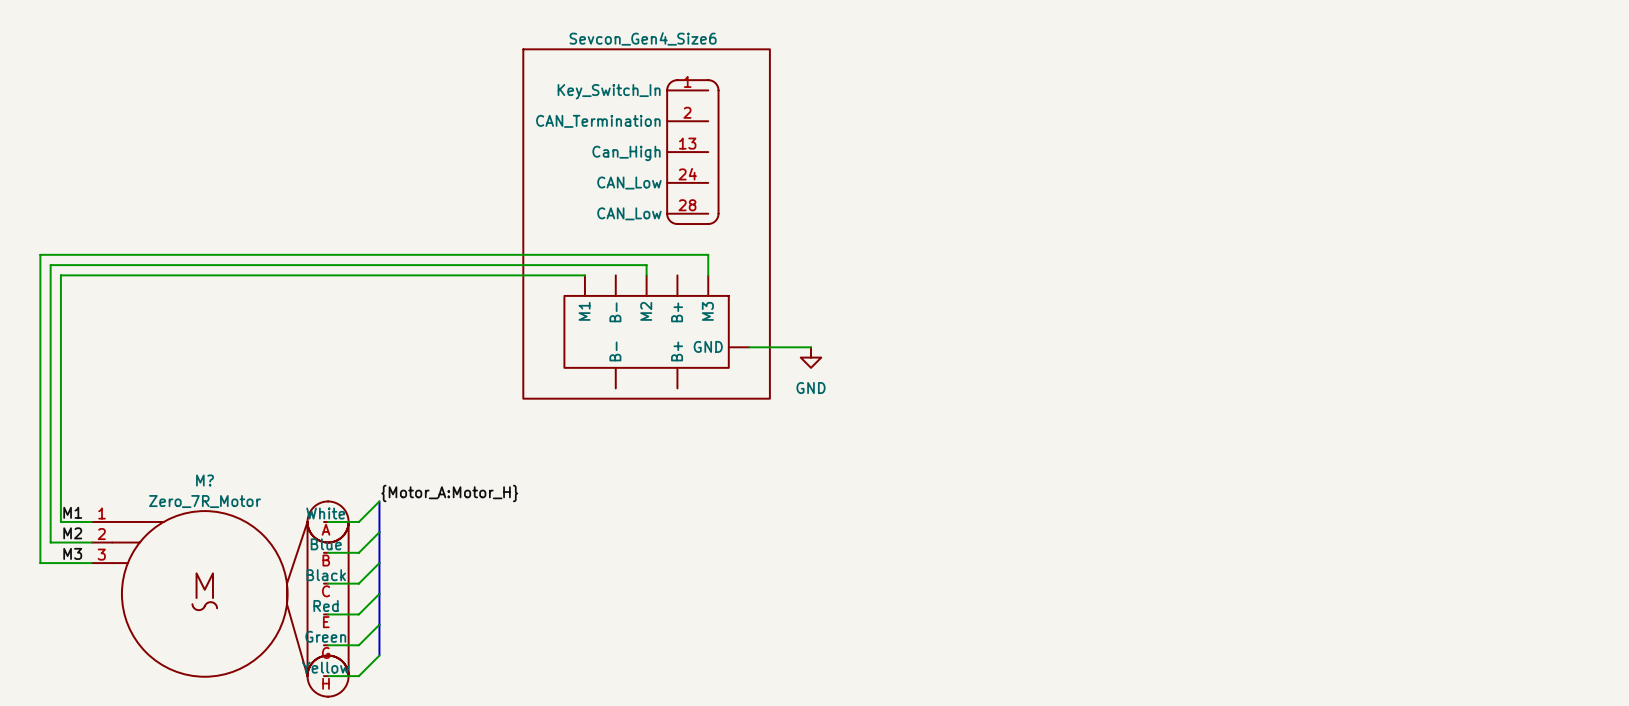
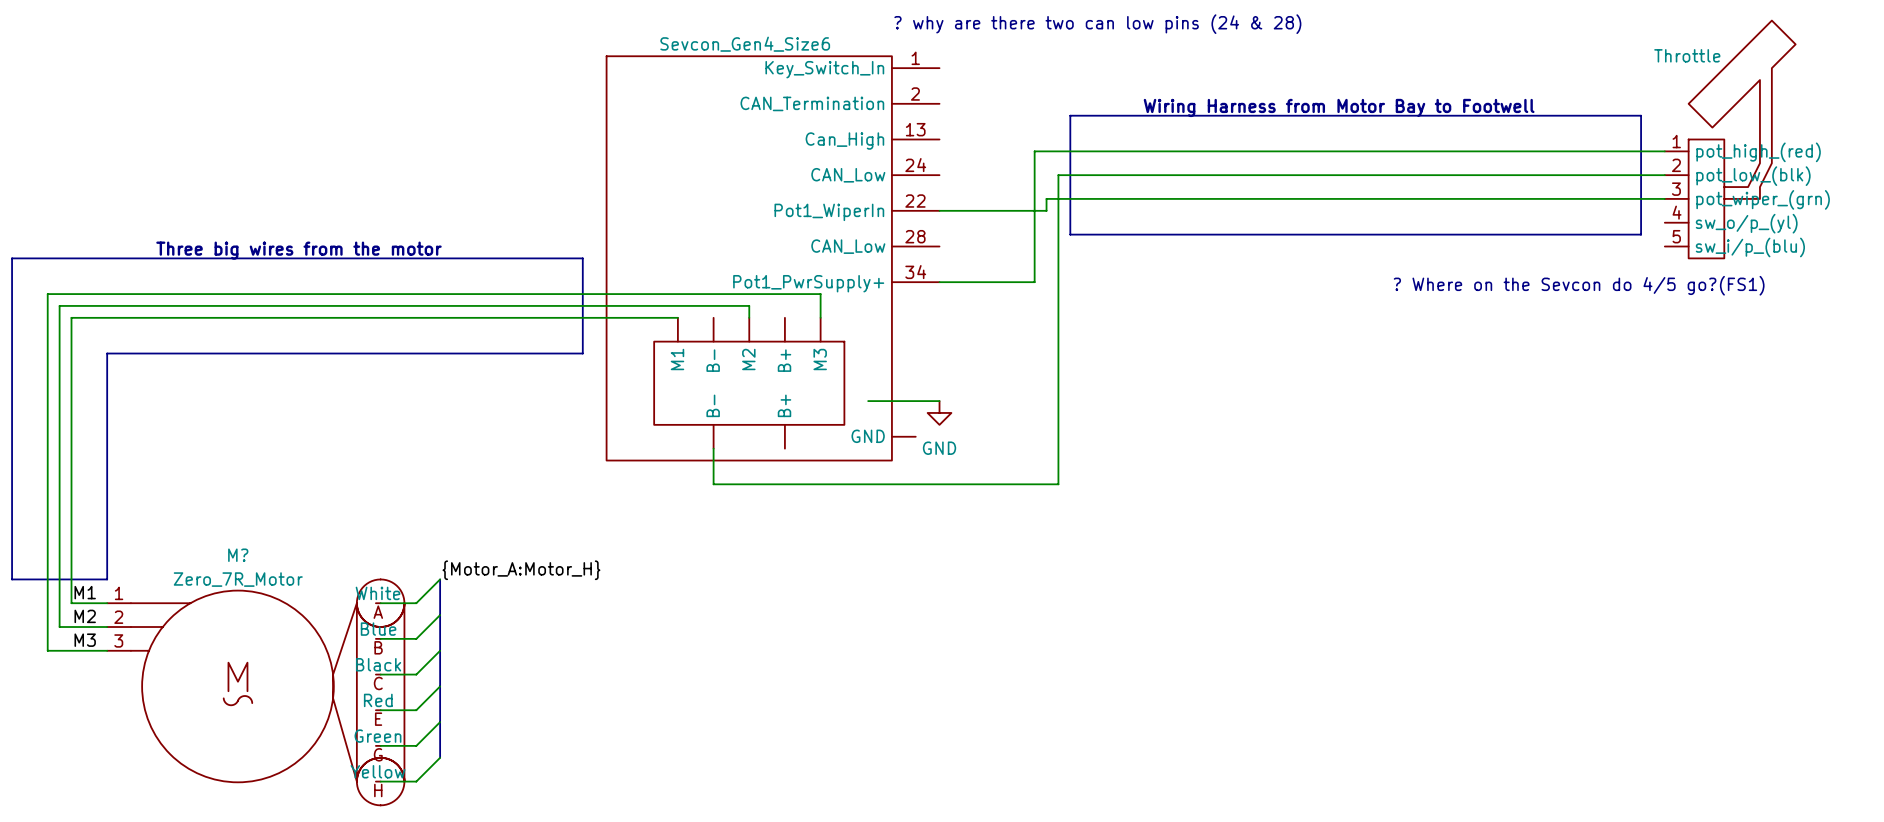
text: none -> ? why are there two can low pins (24 & 28) (1097, 24)
text: none -> Wiring Harness from Motor Bay to Footwell (1339, 107)
line: none -> (1070, 115) (1070, 234) (1641, 234) (1641, 115) (1070, 115)
part: none -> Throttle (1730, 139)
wire: none -> (1664, 151) (1034, 151) (1034, 282) (939, 282)
wire: none -> (1664, 175) (1058, 175) (1058, 484) (713, 484) (713, 448)
wire: none -> (1664, 198) (1046, 198) (1046, 210) (939, 210)
text: none -> Three big wires from the motor (298, 250)
line: none -> (12, 258) (582, 258) (582, 353) (107, 353) (107, 579) (12, 579) (12, 258)
part: Sevcon_Gen4_Size6 (646, 224) -> none
part: none -> Sevcon_Gen4_Size6 (773, 258)
text: none -> ? Where on the Sevcon do 4/5 go?(FS1) (1579, 285)

